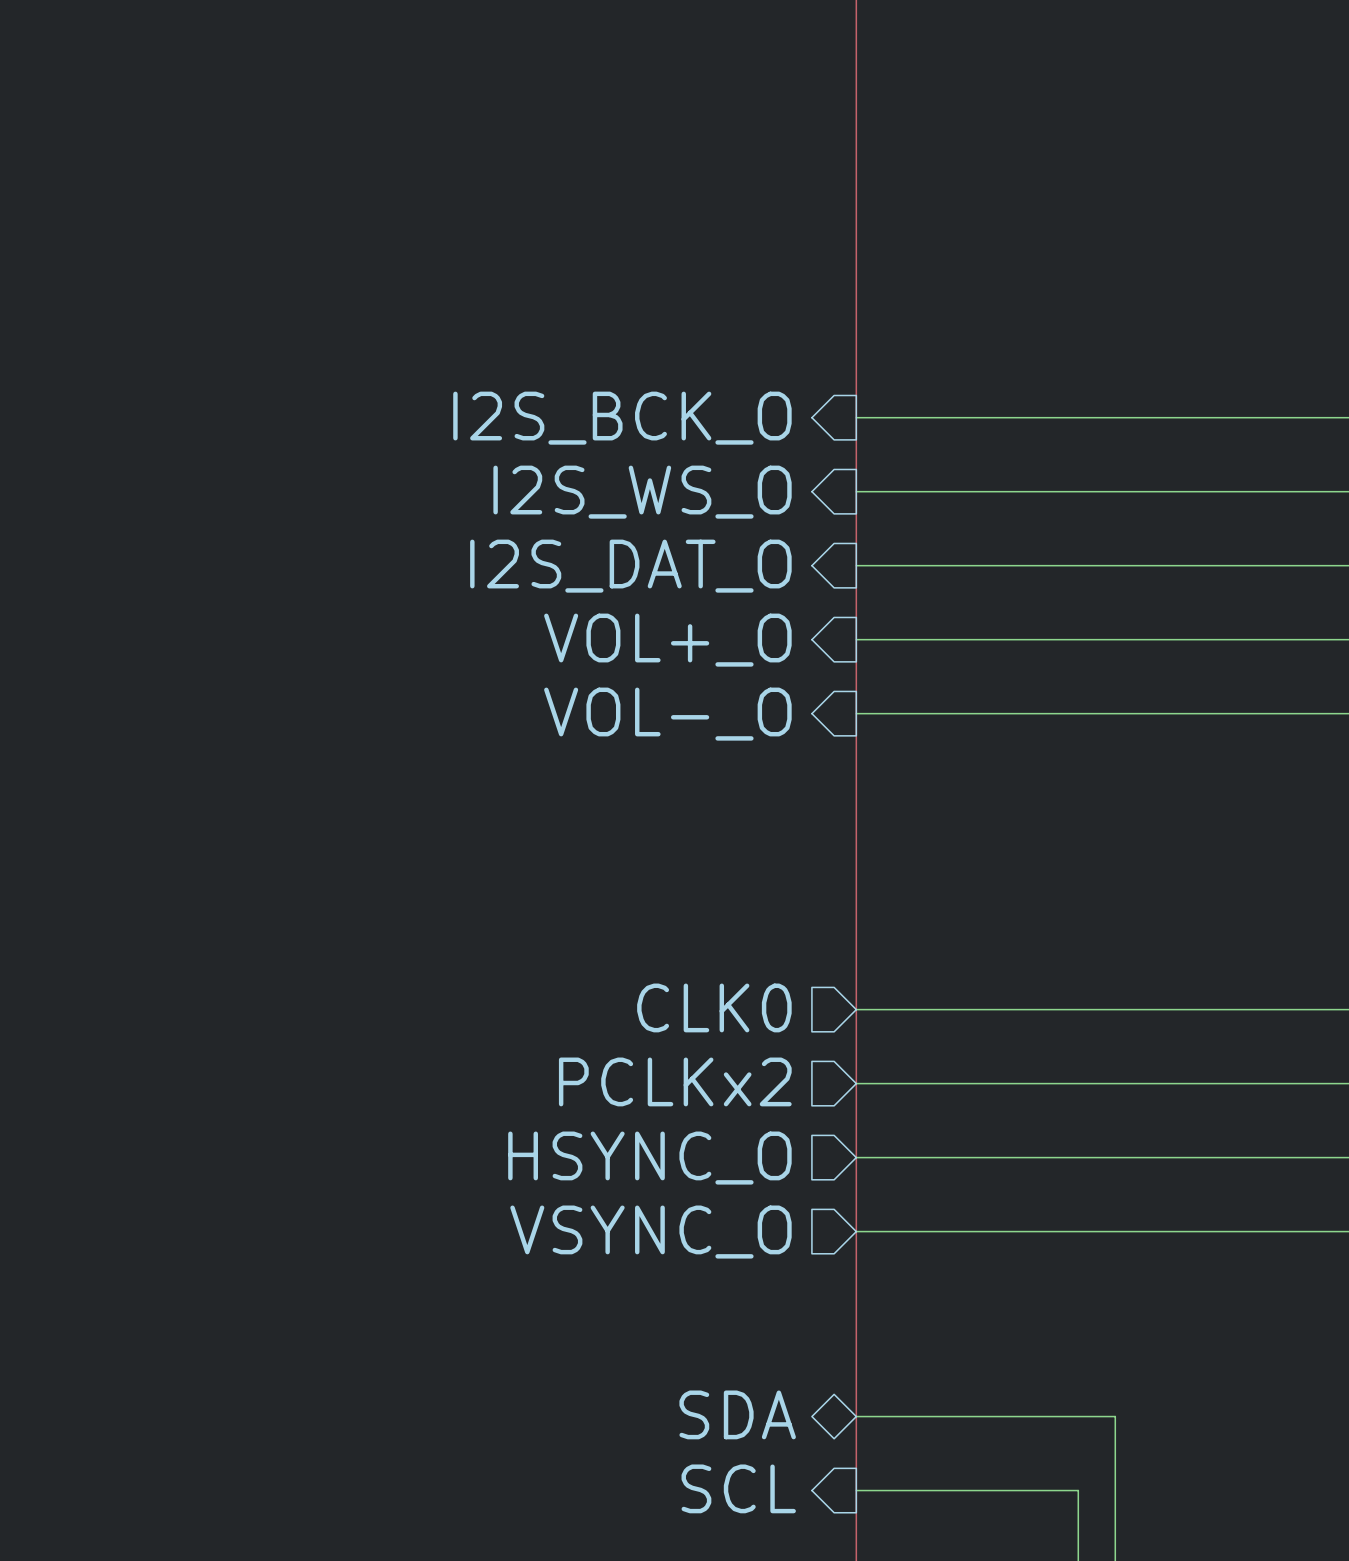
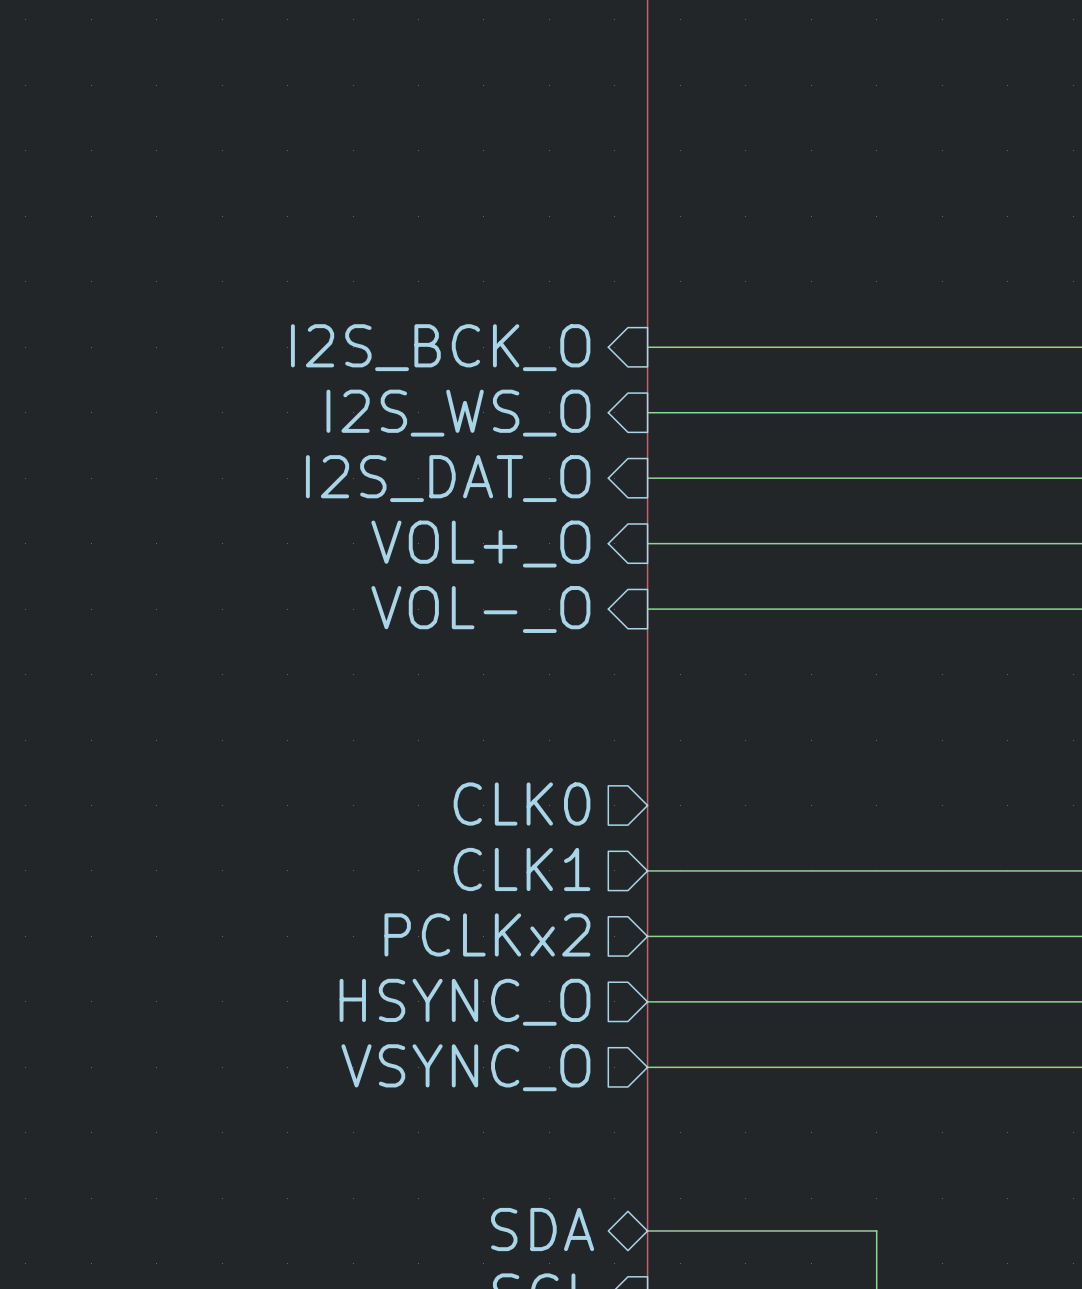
sheet pin: none -> CLK0 (522, 804)
sheet pin: CLK0 (714, 1007) -> CLK1 (522, 869)

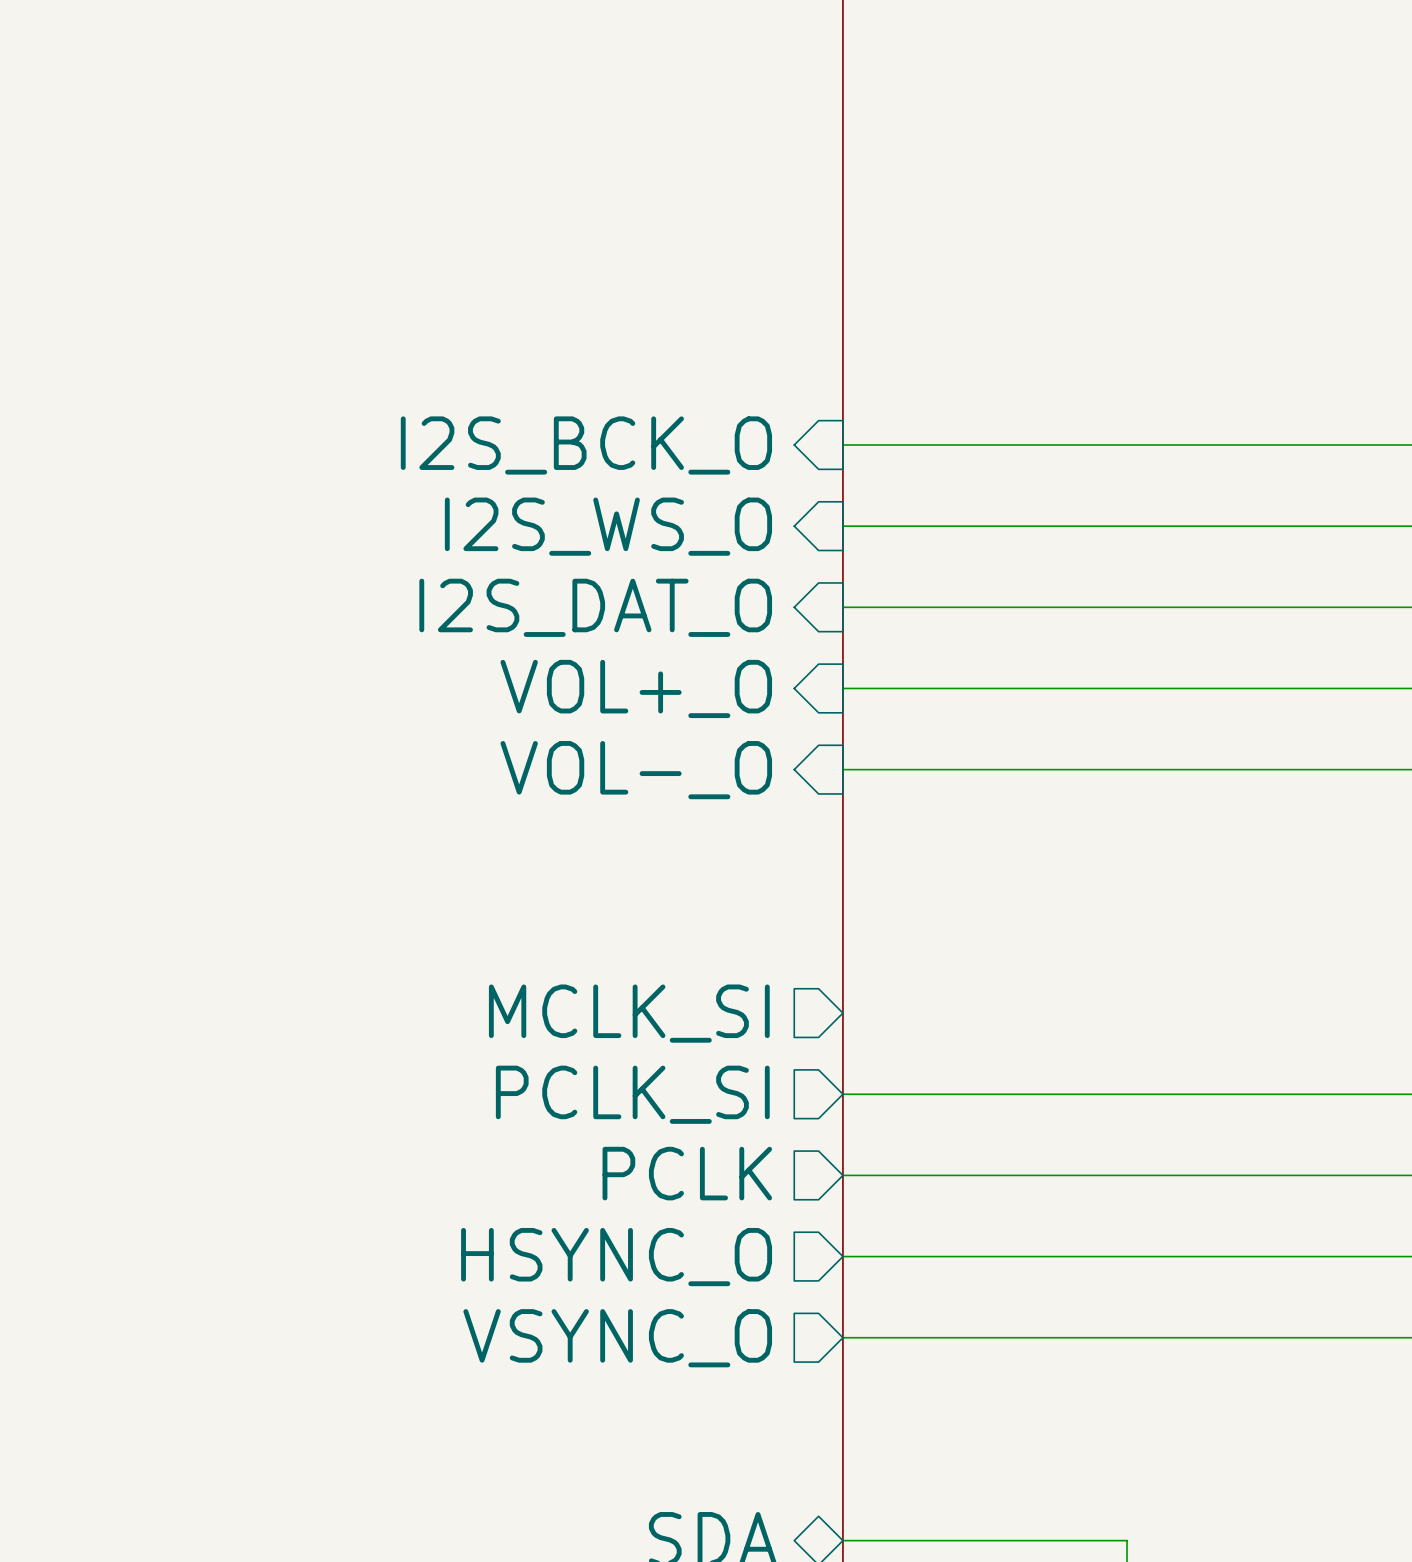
sheet pin: CLK0 (522, 804) -> MCLK_SI (629, 1013)
sheet pin: CLK1 (522, 869) -> PCLK_SI (632, 1094)
sheet pin: PCLKx2 (487, 934) -> PCLK (687, 1173)

